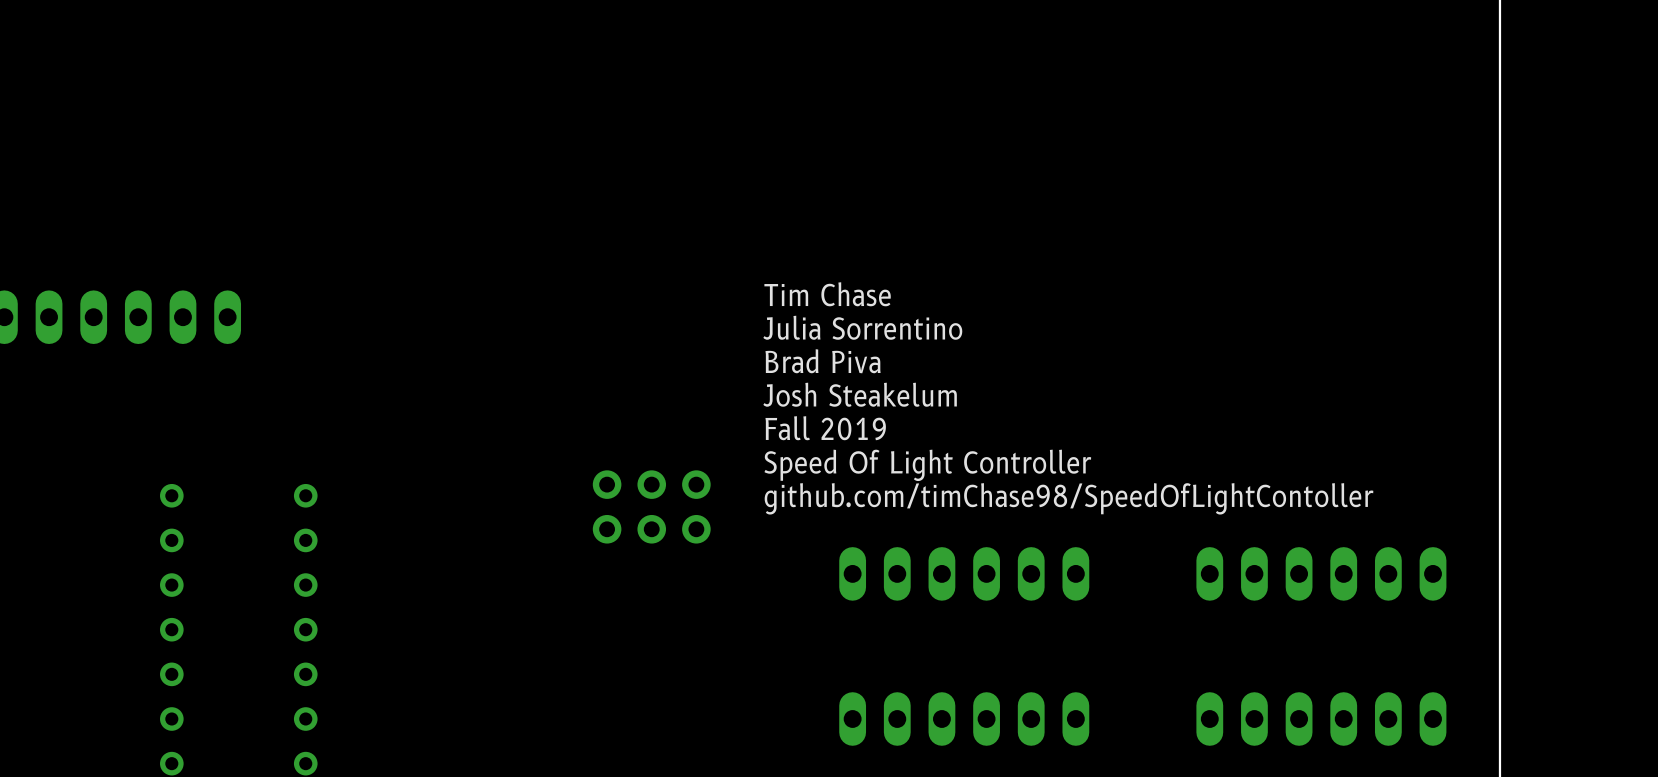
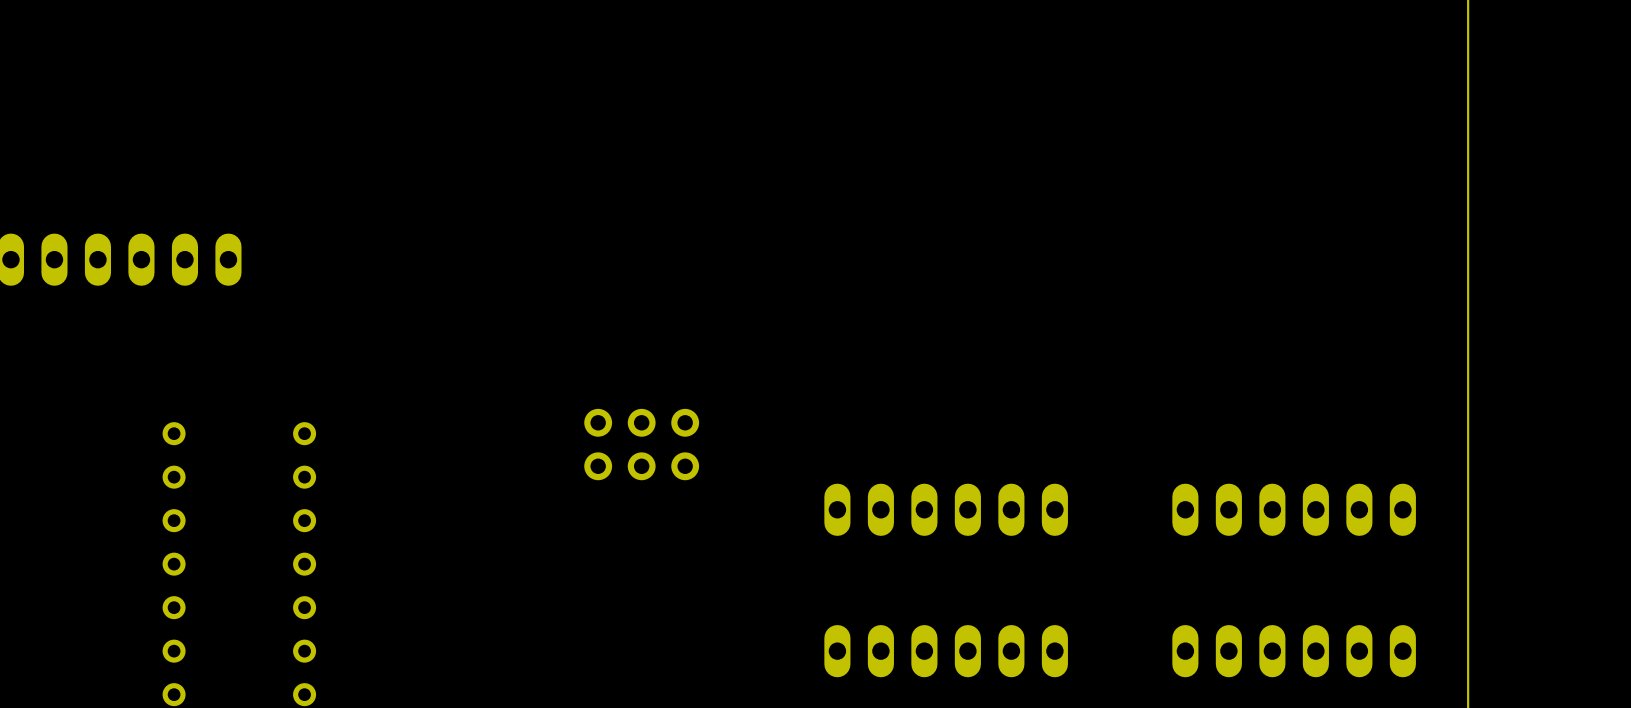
text: Tim Chase (827, 294) -> none
text: Julia Sorrentino (862, 327) -> none
text: Brad Piva (823, 361) -> none
text: Josh Steakelum (860, 394) -> none
text: Fall 2019 (825, 428) -> none
text: Speed Of Light Controller (927, 465) -> none
text: github.com/timChase98/SpeedOfLightContoller (1068, 498) -> none

